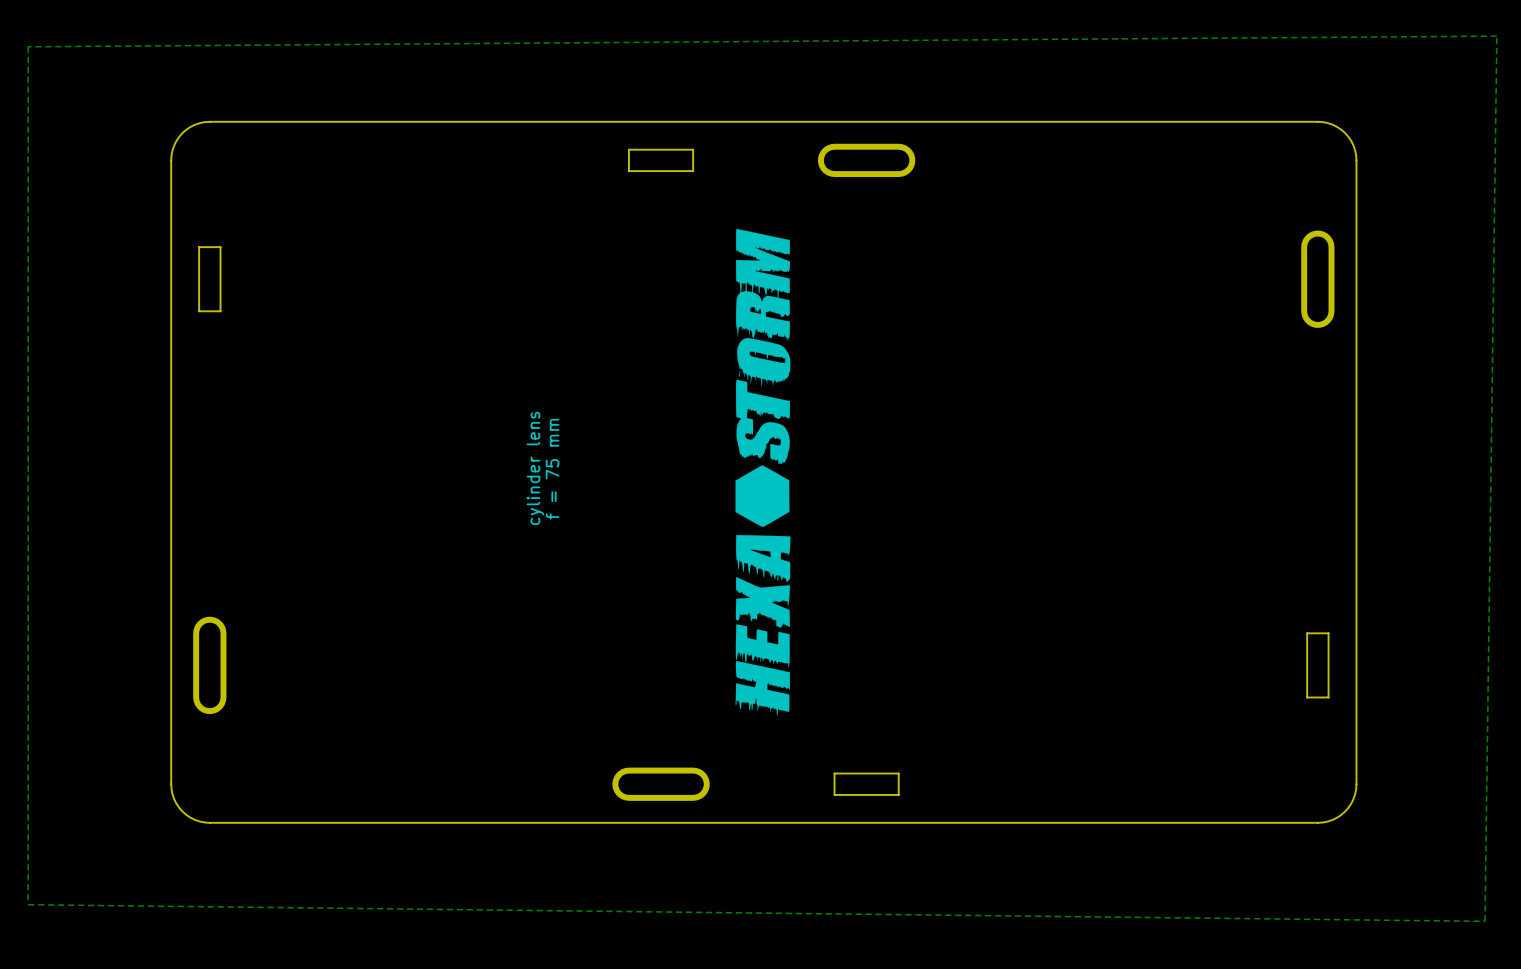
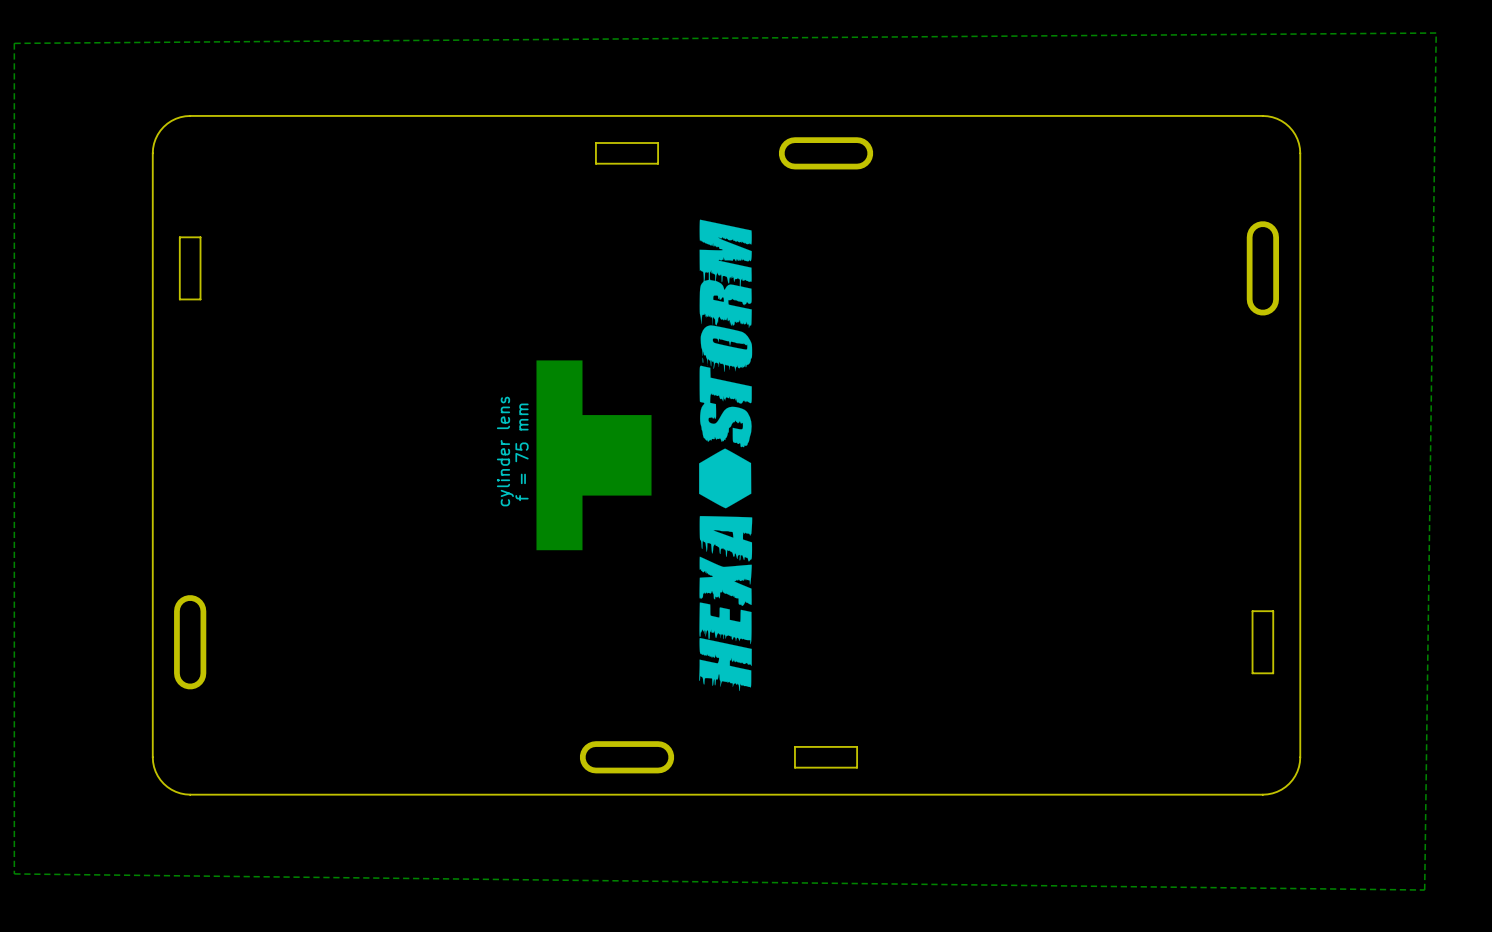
part: none -> (594, 455)

